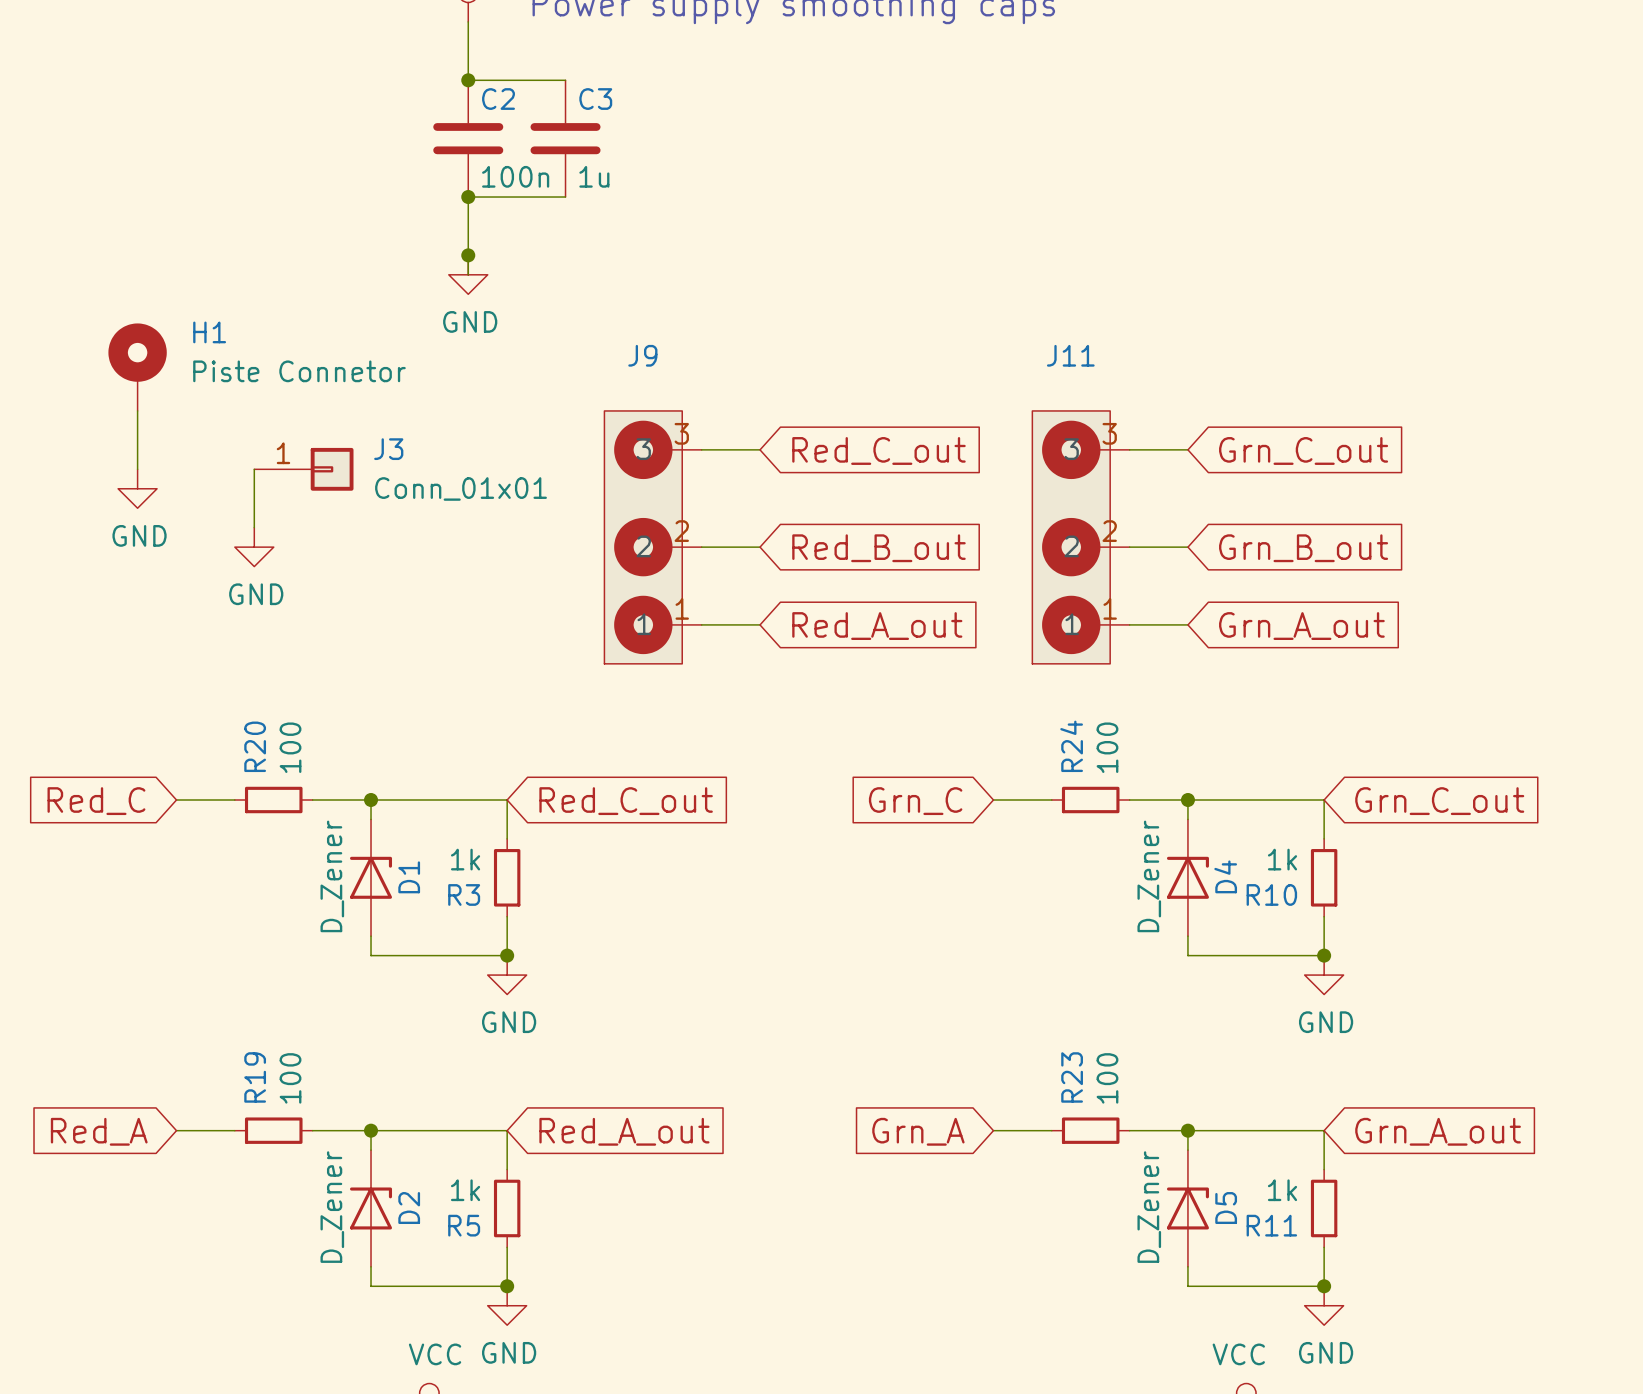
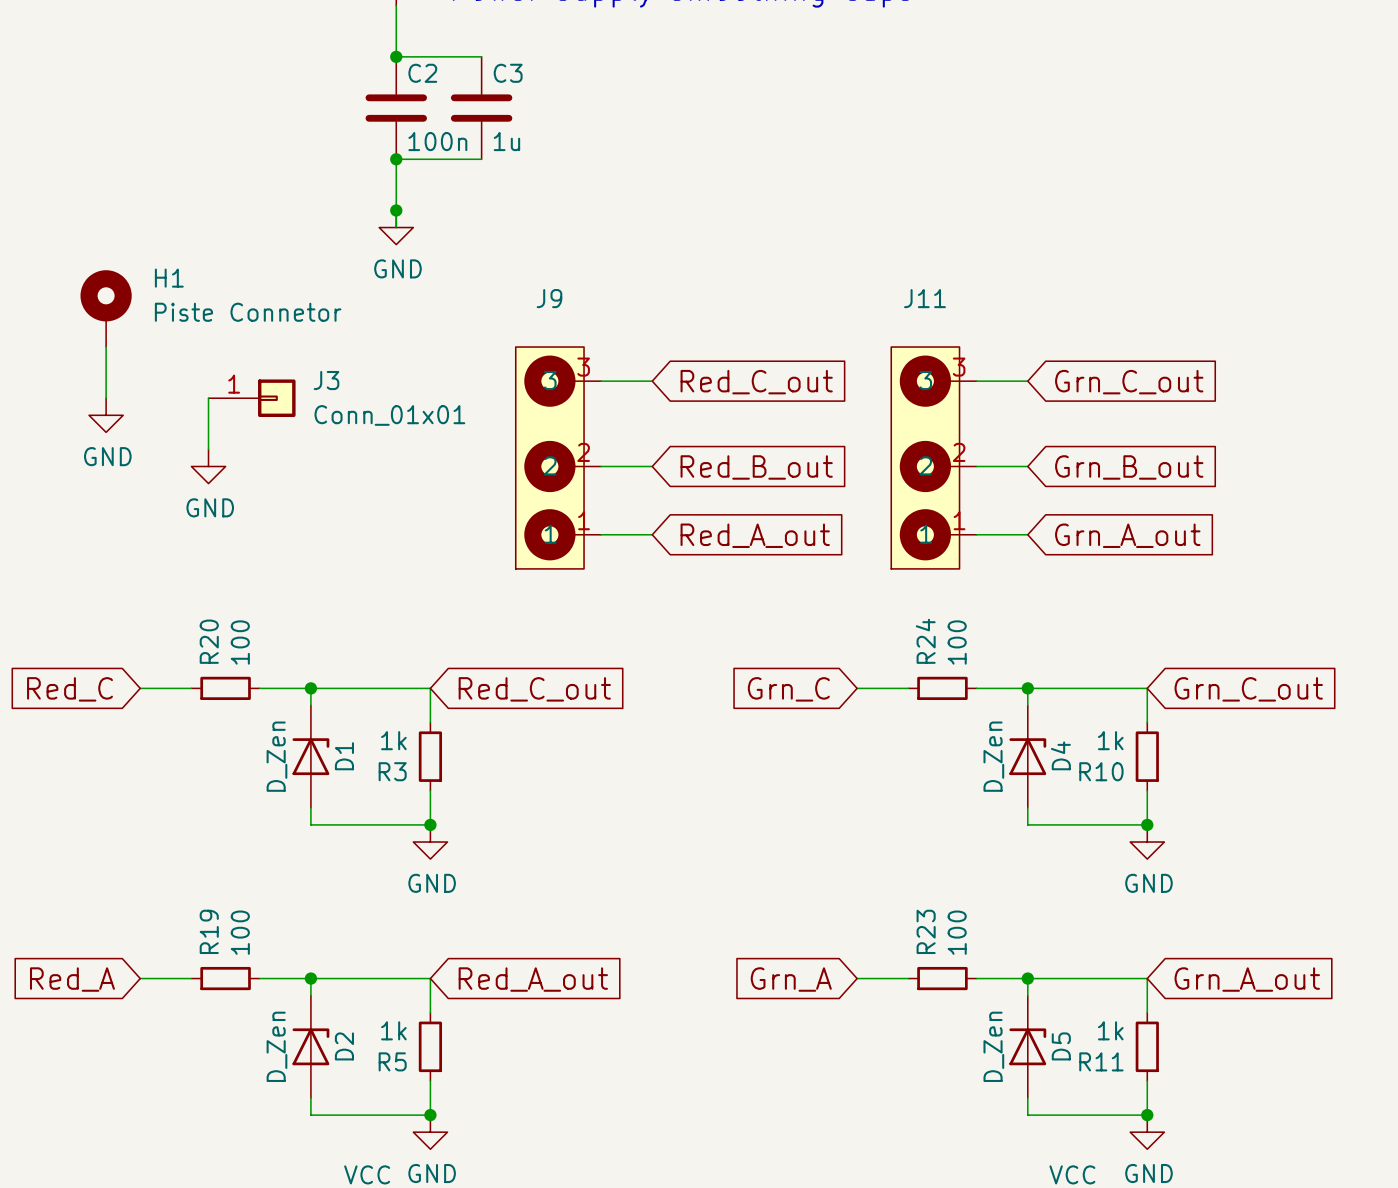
D1 value: D_Zener (332, 876) -> D_Zen (276, 756)
D4 value: D_Zener (1149, 876) -> D_Zen (993, 756)
D2 value: D_Zener (332, 1207) -> D_Zen (276, 1046)
D5 value: D_Zener (1149, 1207) -> D_Zen (993, 1046)

